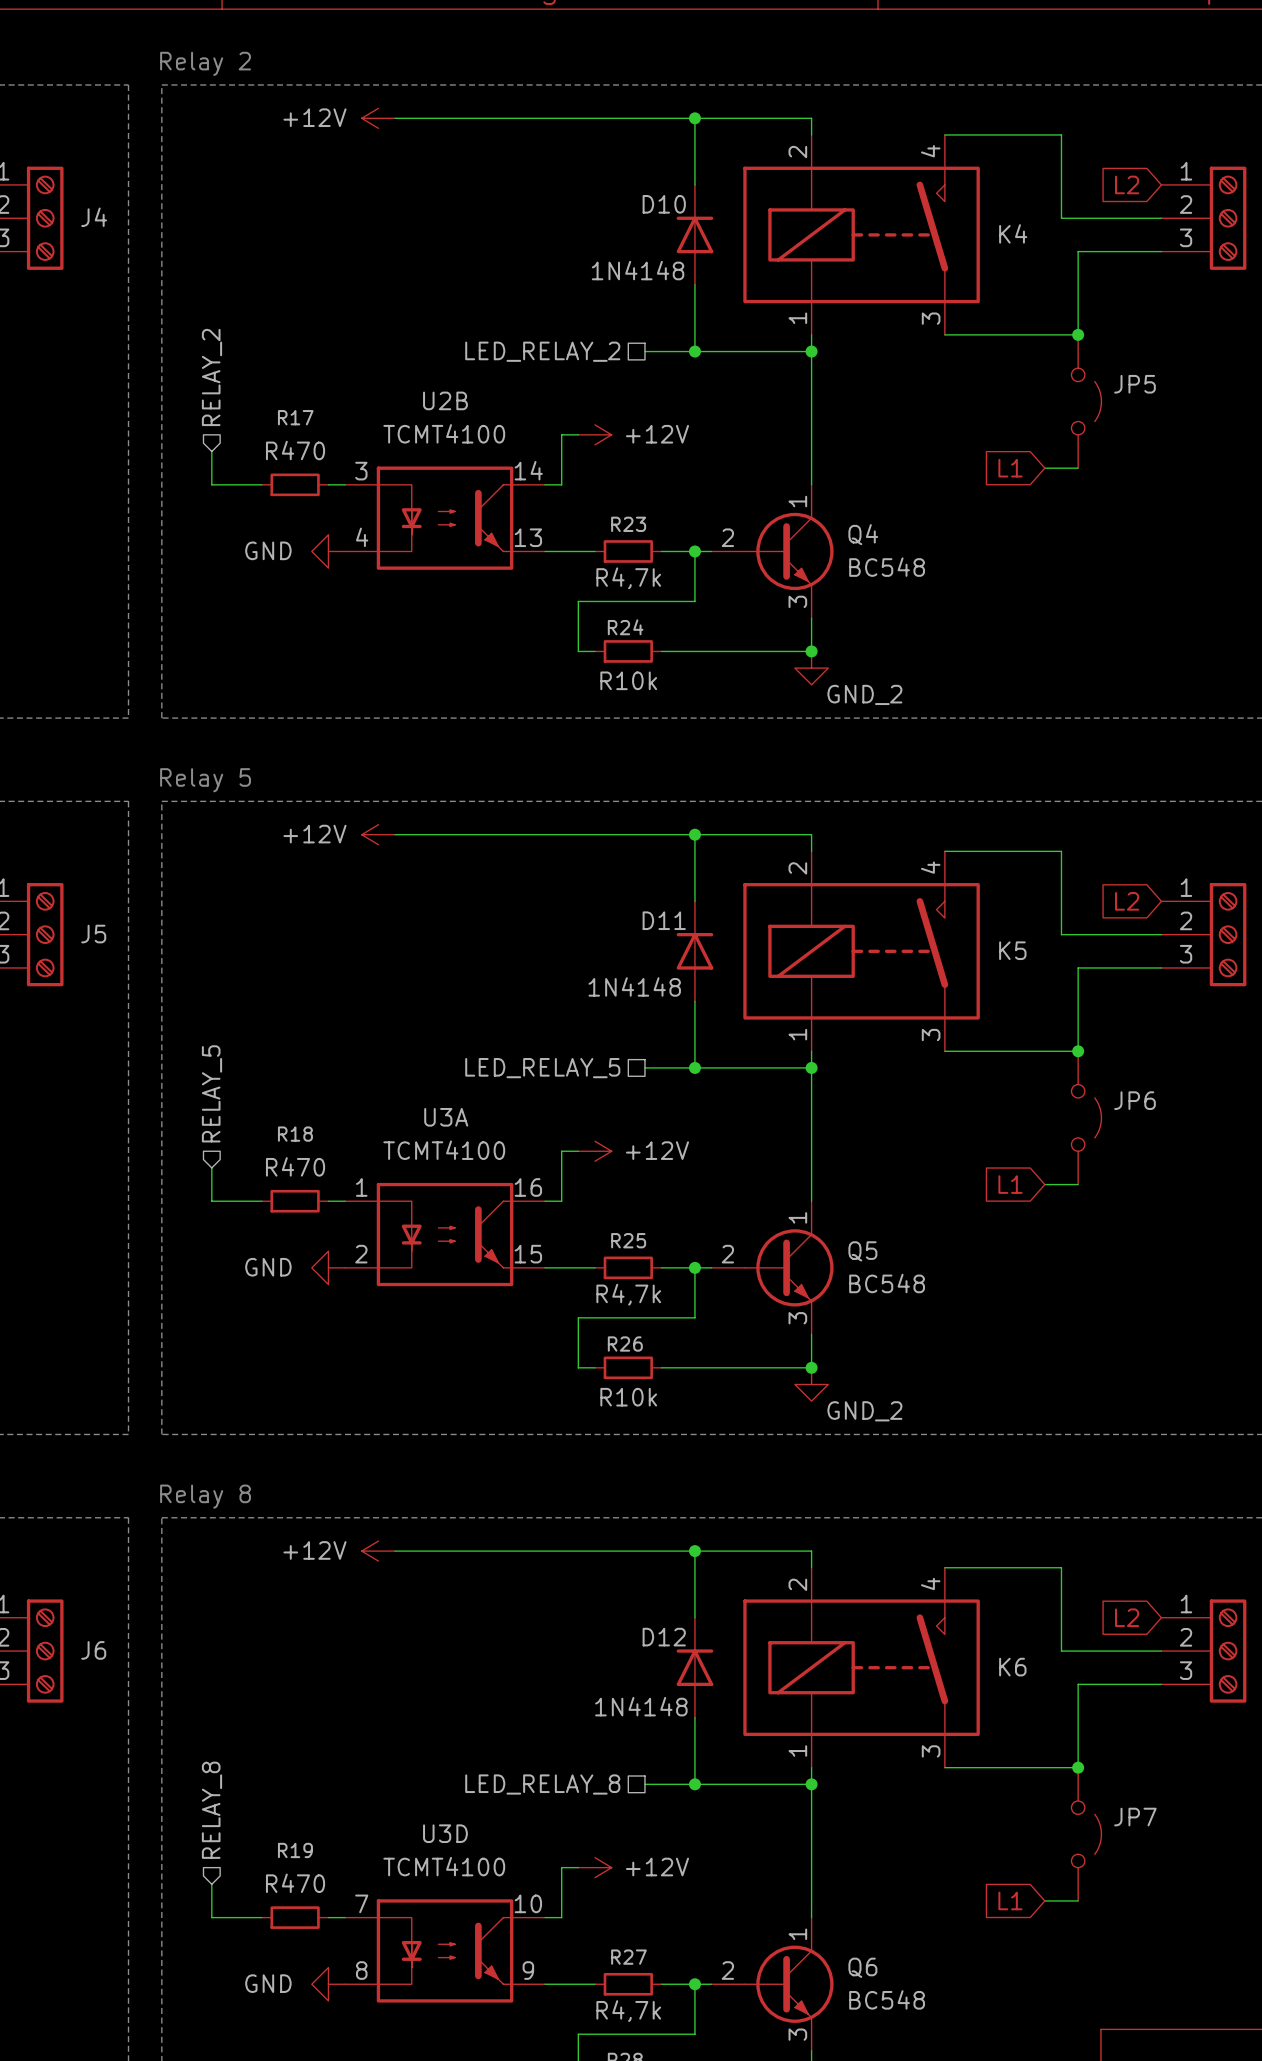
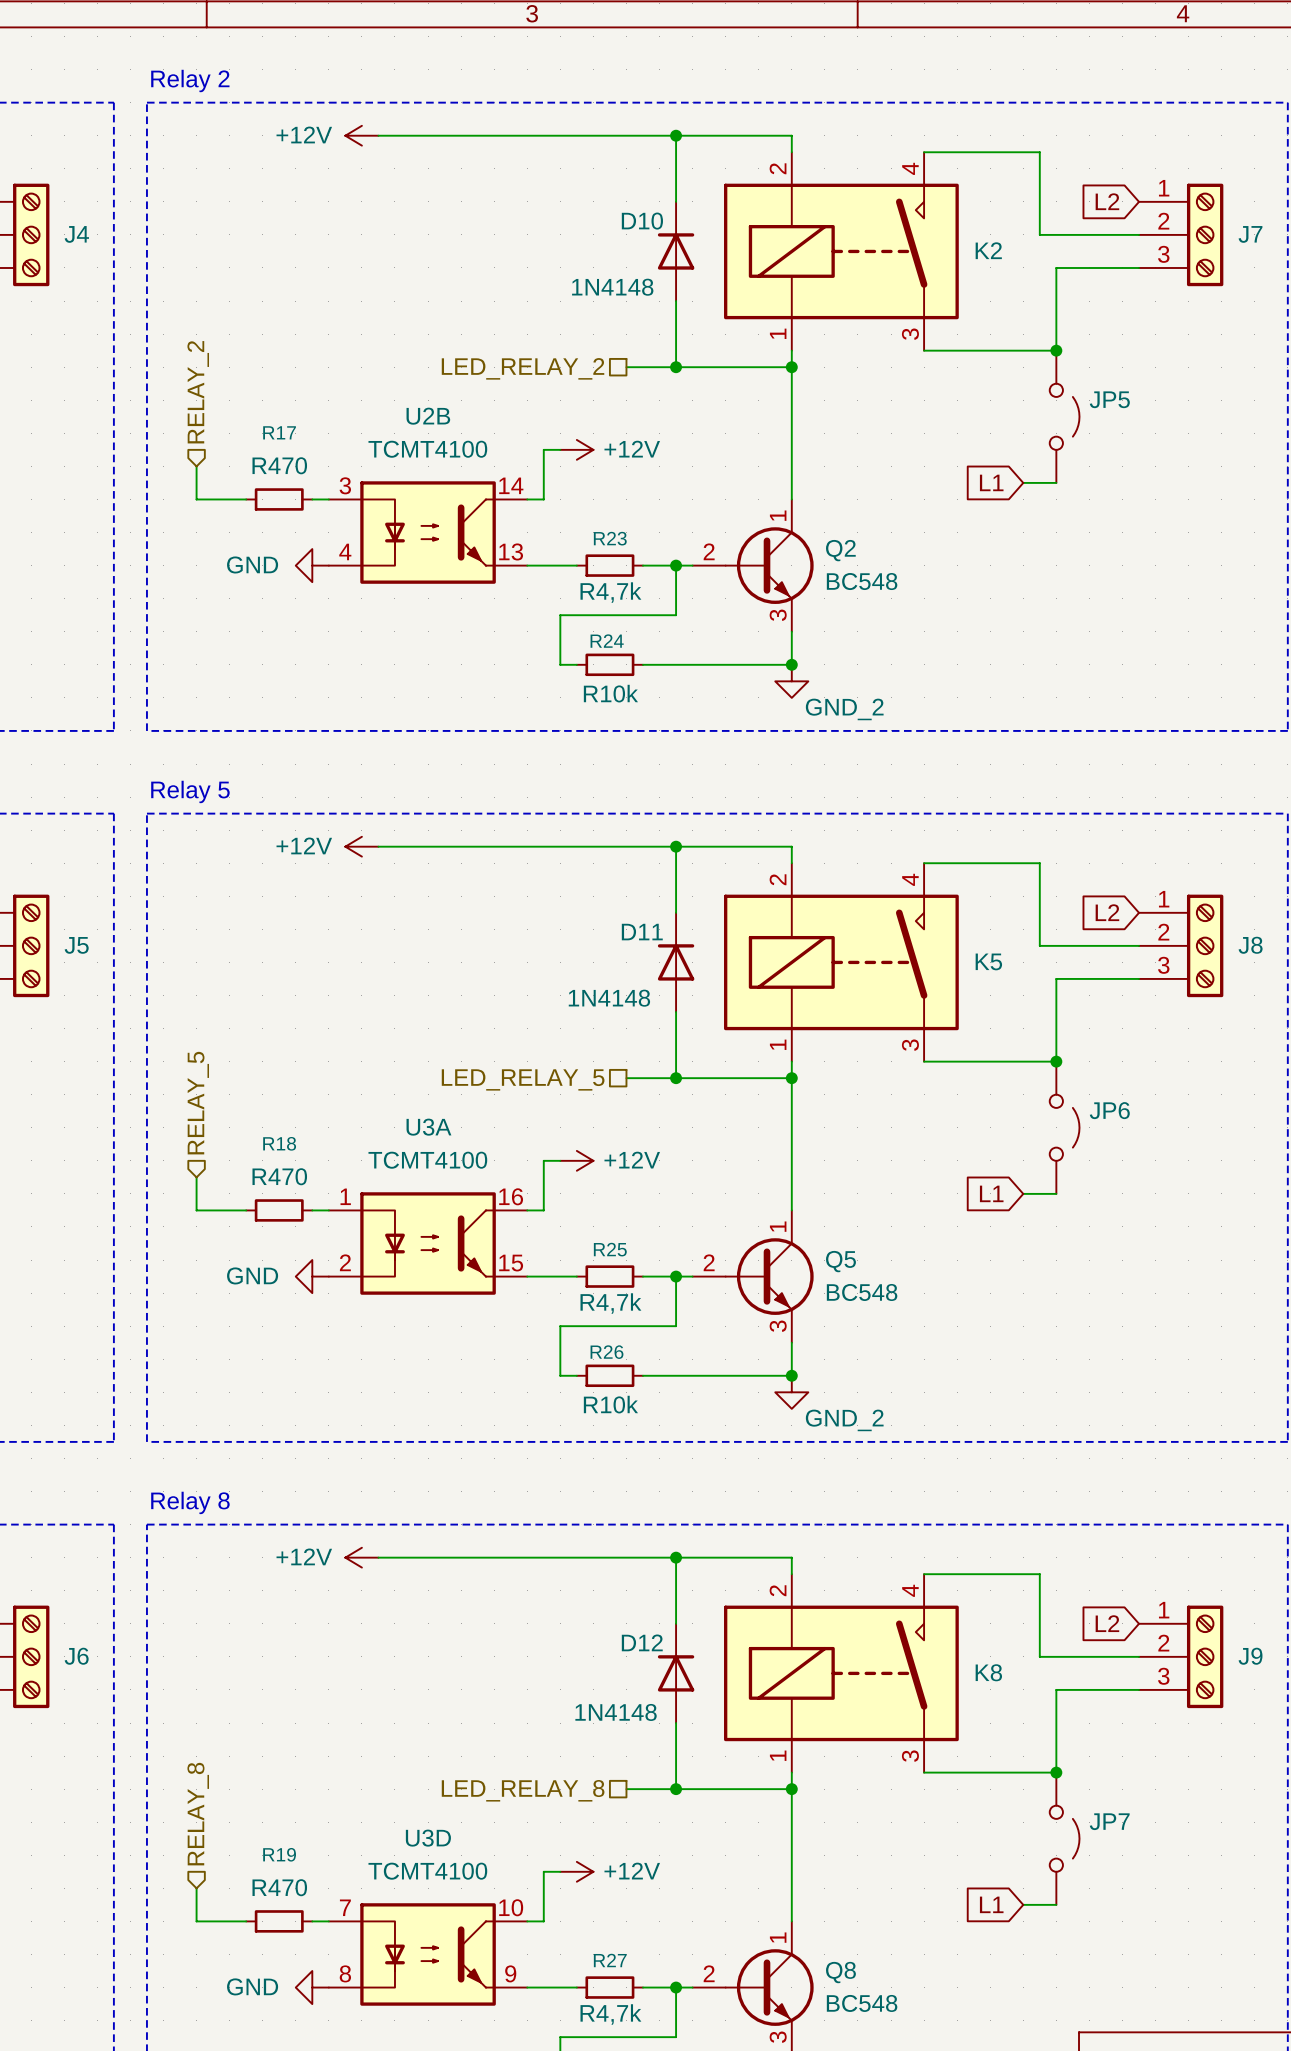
K4 name: K4 (1013, 233) -> K2 (988, 250)
Q4 name: Q4 (863, 534) -> Q2 (840, 550)
K6 name: K6 (1012, 1667) -> K8 (988, 1672)
Q6 name: Q6 (862, 1967) -> Q8 (840, 1972)

